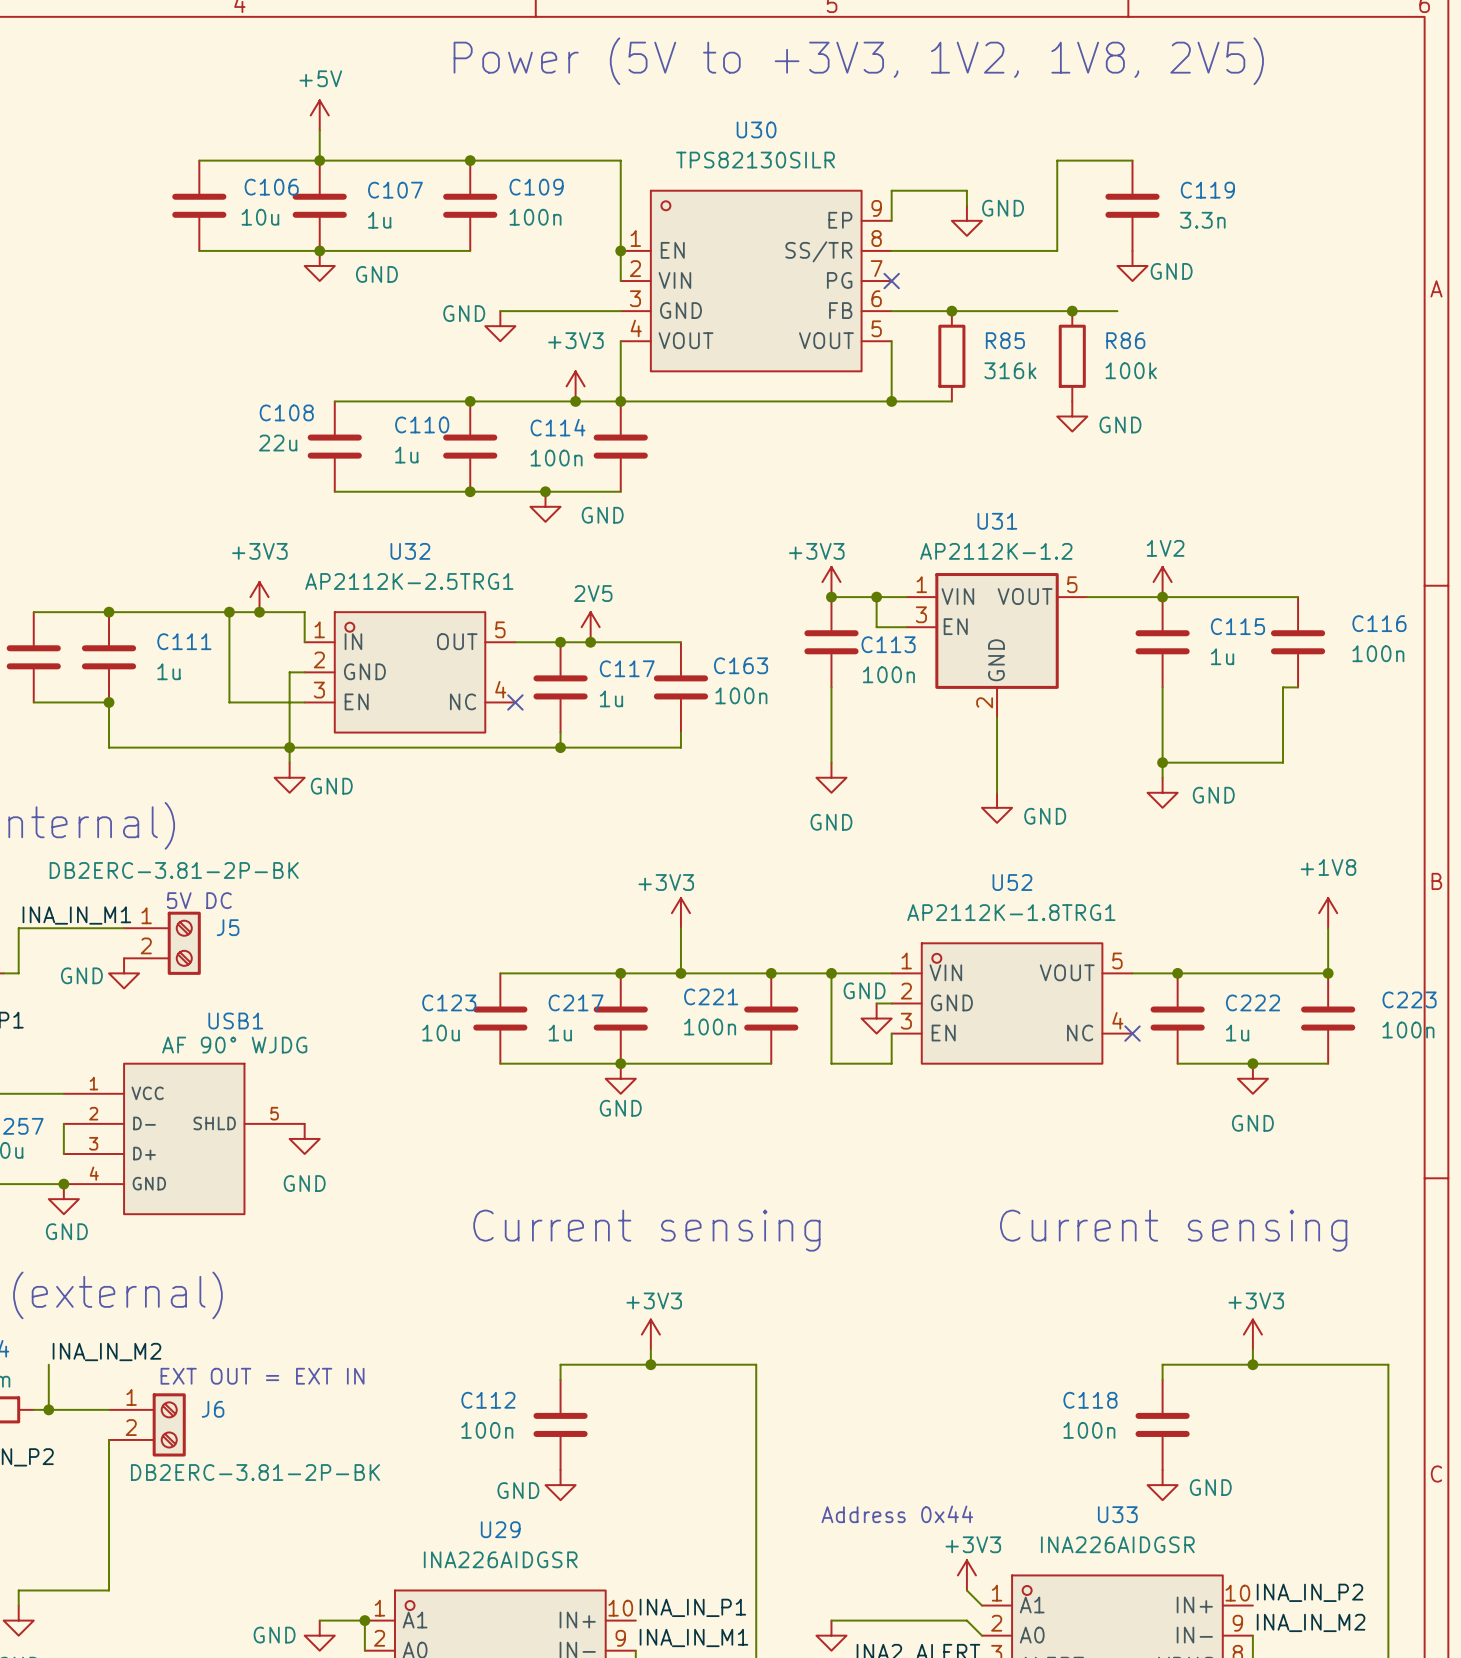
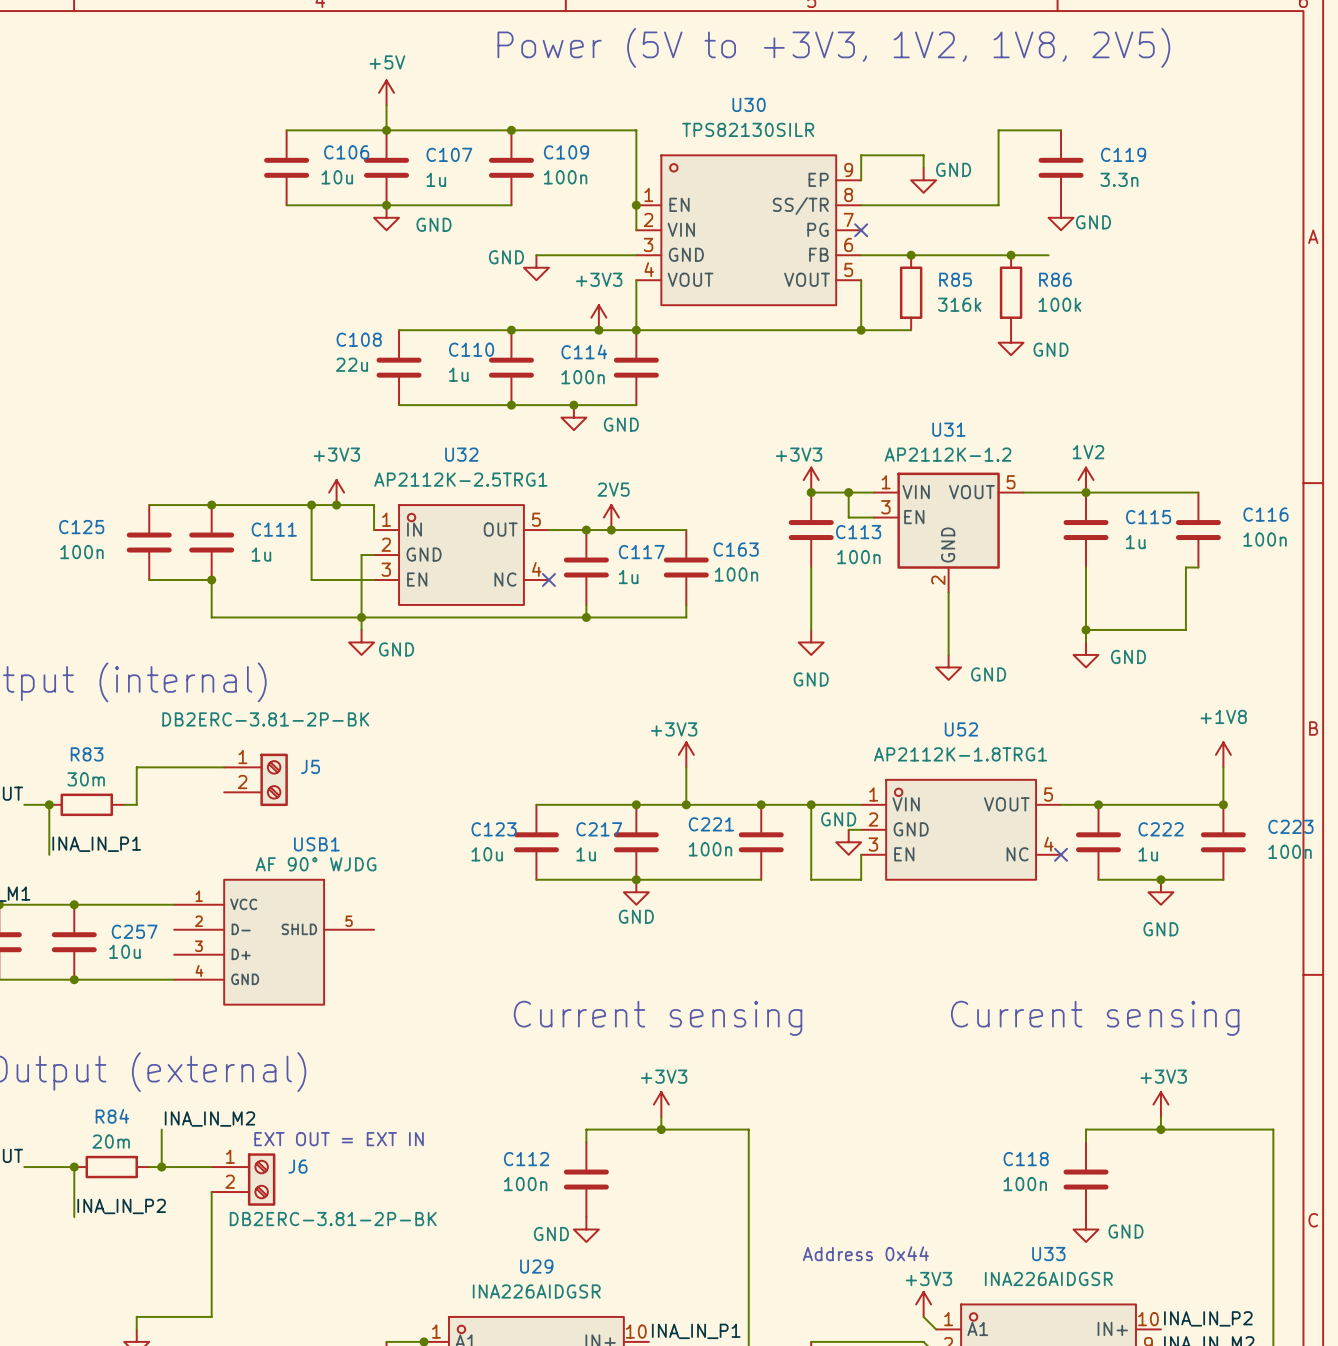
text: 5V DC (199, 900) -> none
label: INA_IN_M1 (76, 915) -> none
power symbol: GND (124, 973) -> none
wire: (63, 1123) (63, 1154) -> none
power symbol: GND (304, 1138) -> none
junction: (63, 1184) -> none
power symbol: GND (63, 1199) -> none

